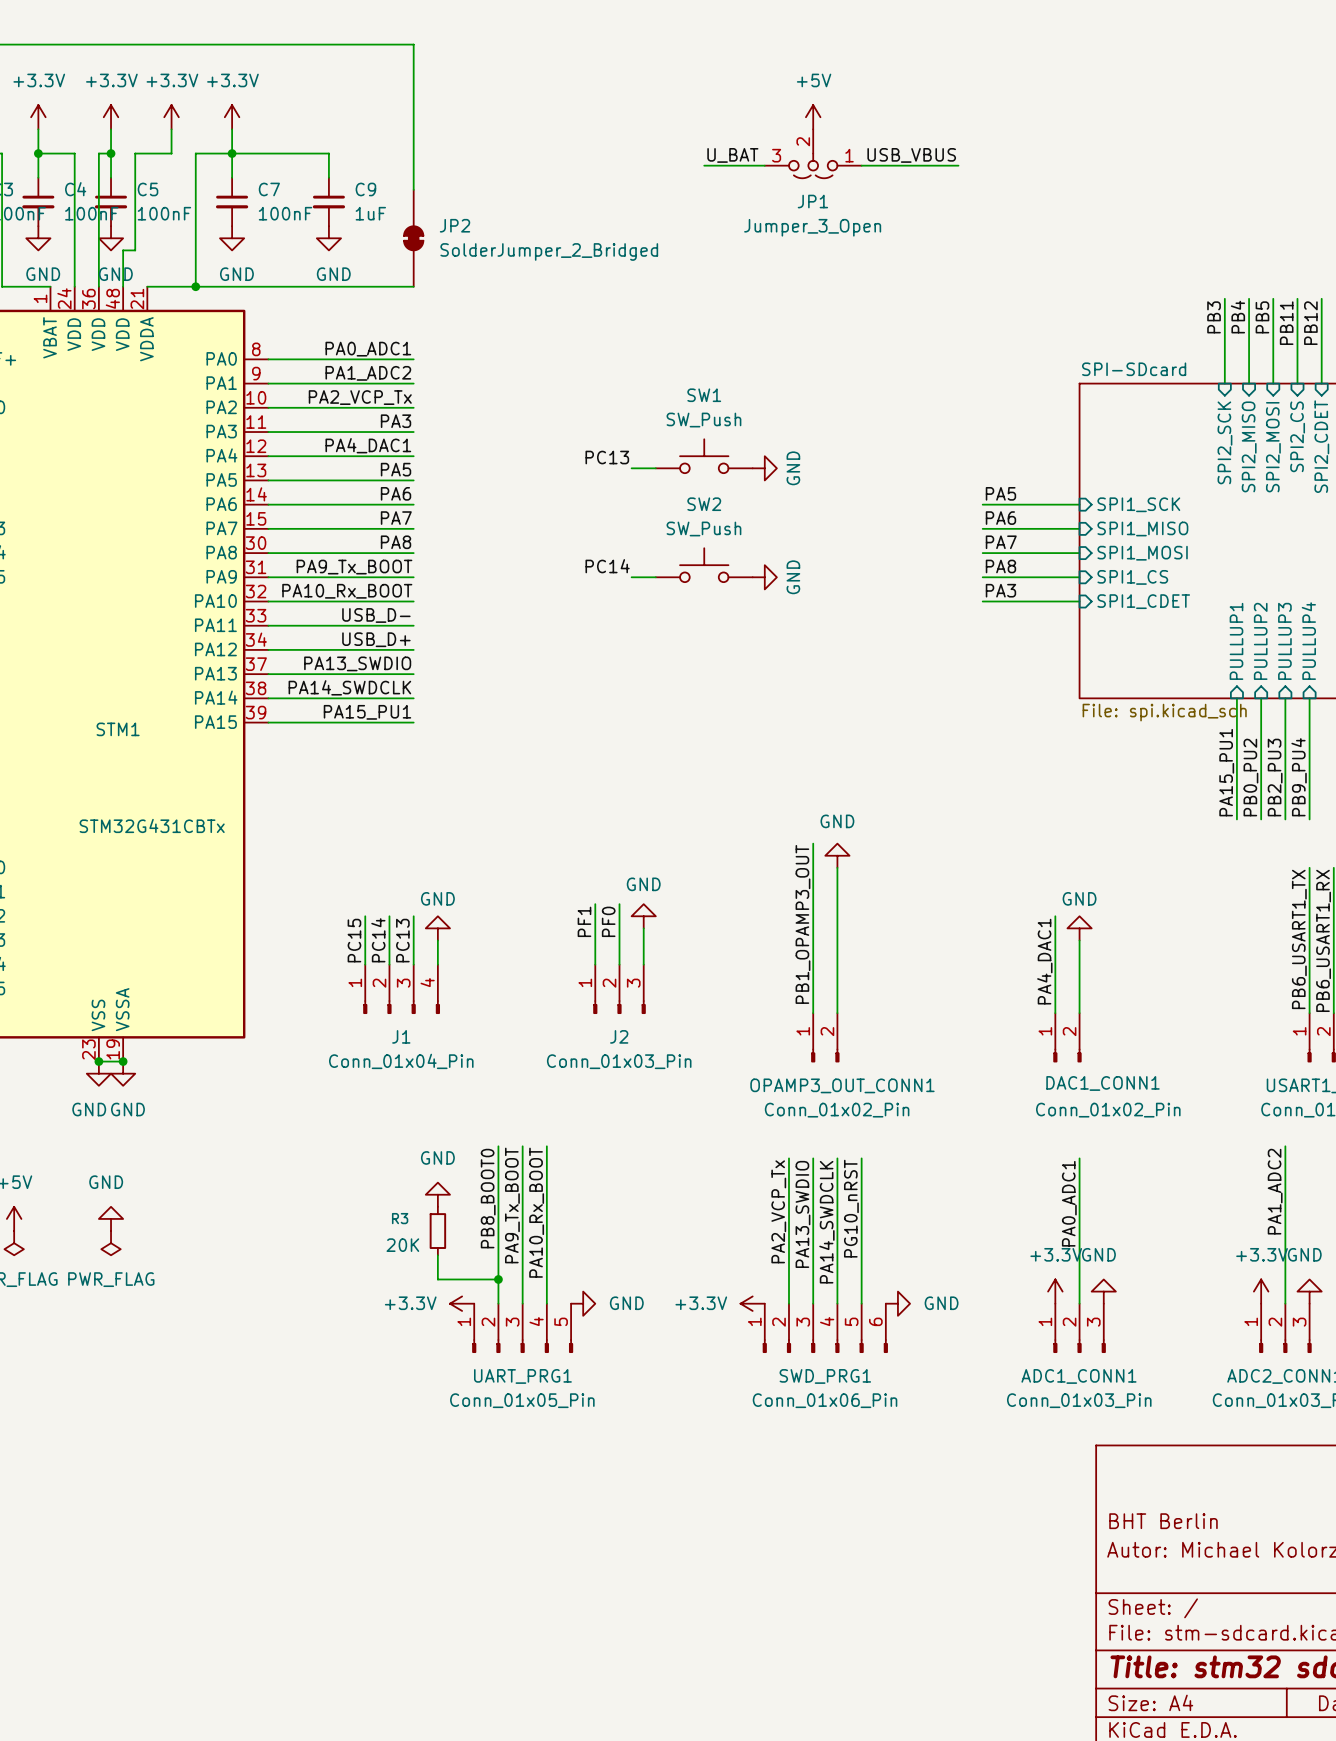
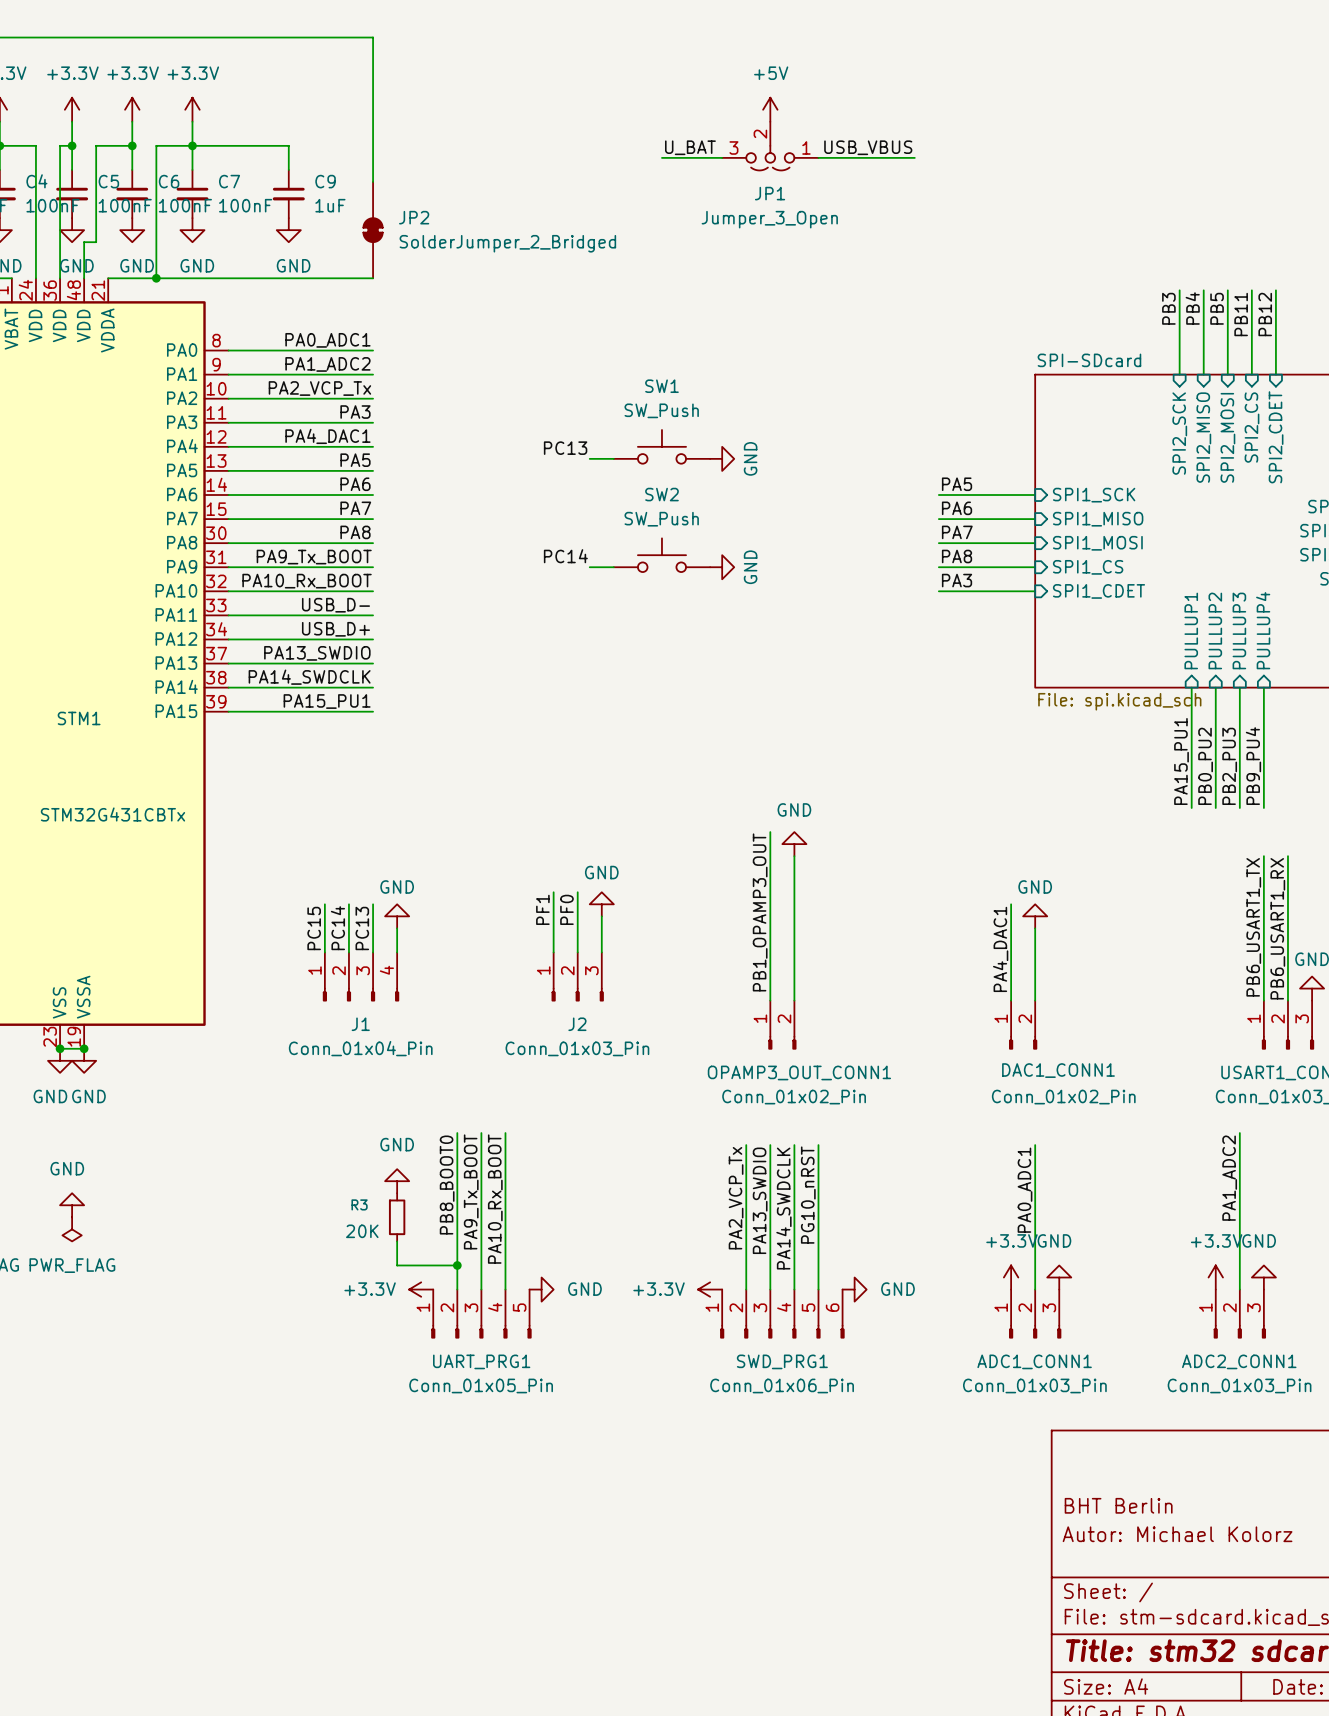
wire: none -> (132, 145) (132, 169)
junction: none -> (132, 145)
C6: none -> 100nF (132, 194)
power symbol: none -> GND (132, 230)

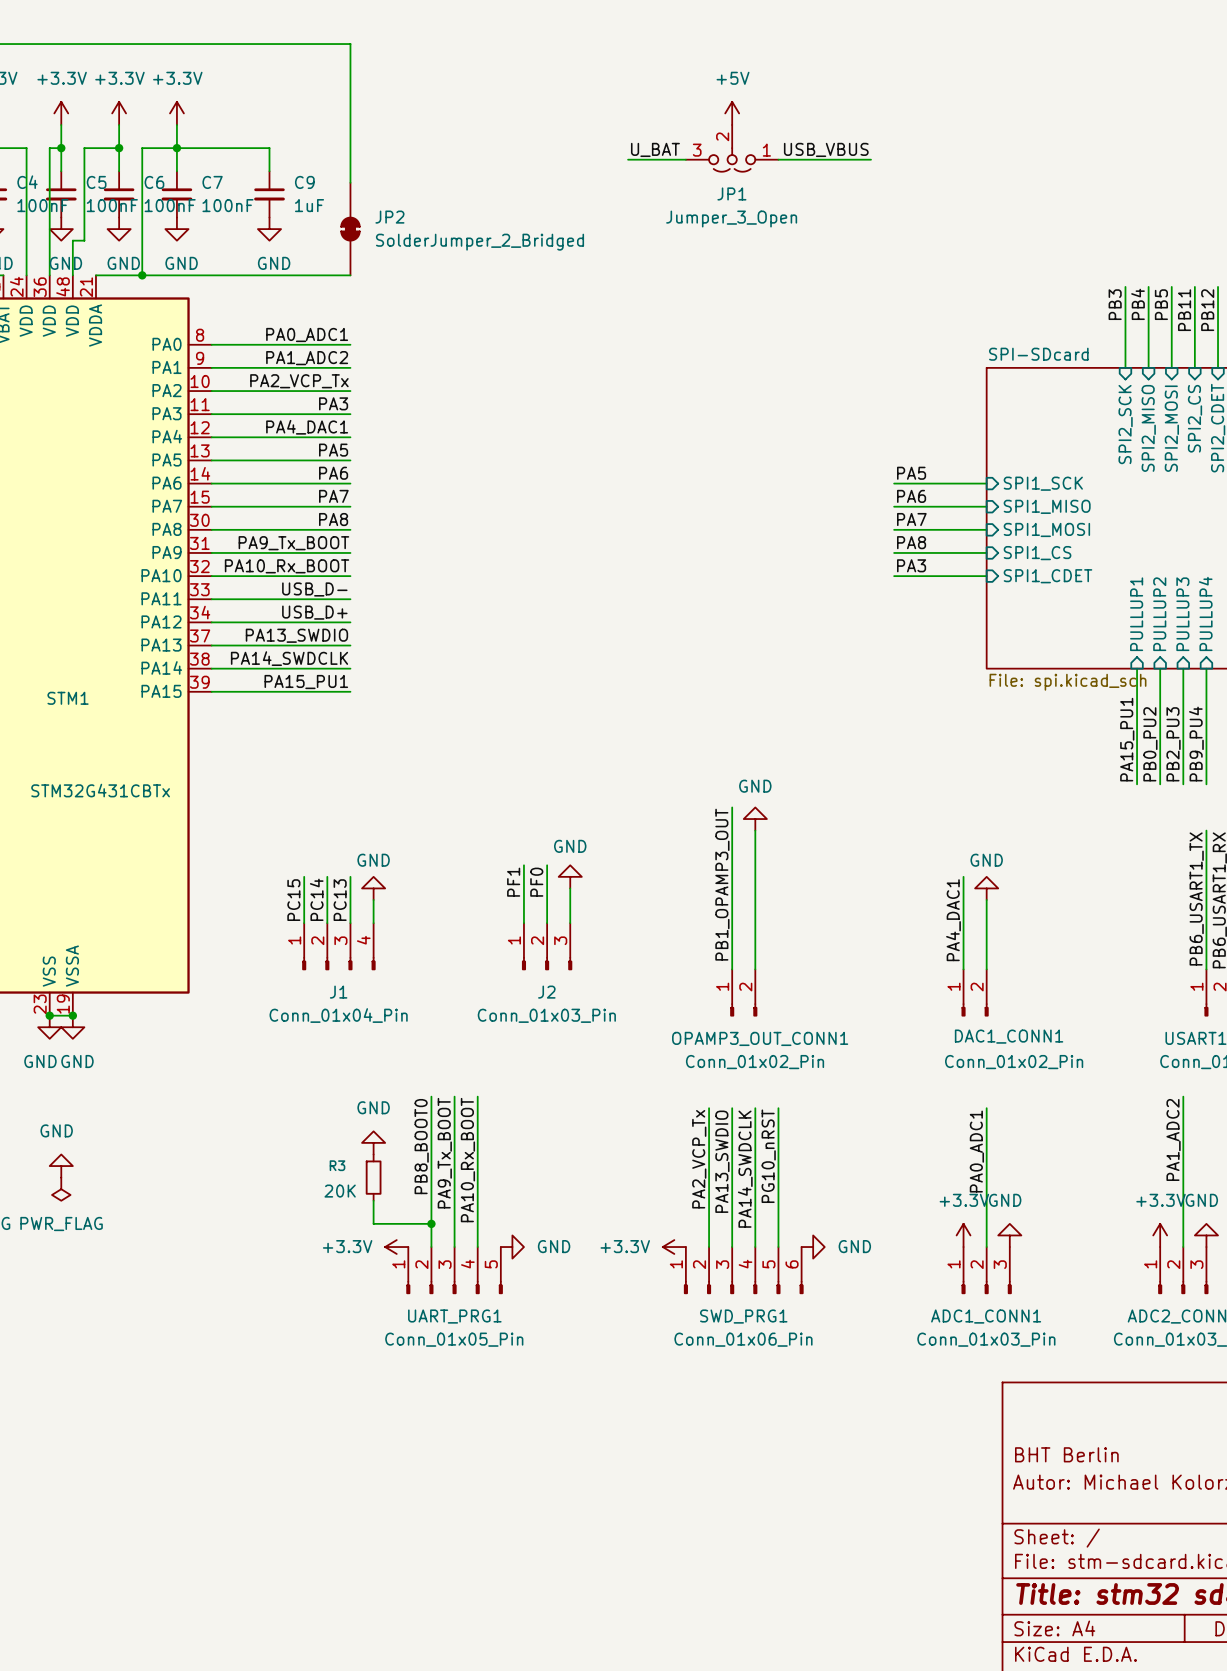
SW1: SW_Push (661, 446) -> none
label: PC13 (565, 448) -> none
wire: (589, 458) (613, 458) -> none
power symbol: GND (722, 458) -> none
SW2: SW_Push (661, 555) -> none
label: PC14 (565, 556) -> none
wire: (589, 567) (613, 567) -> none
power symbol: GND (722, 567) -> none

